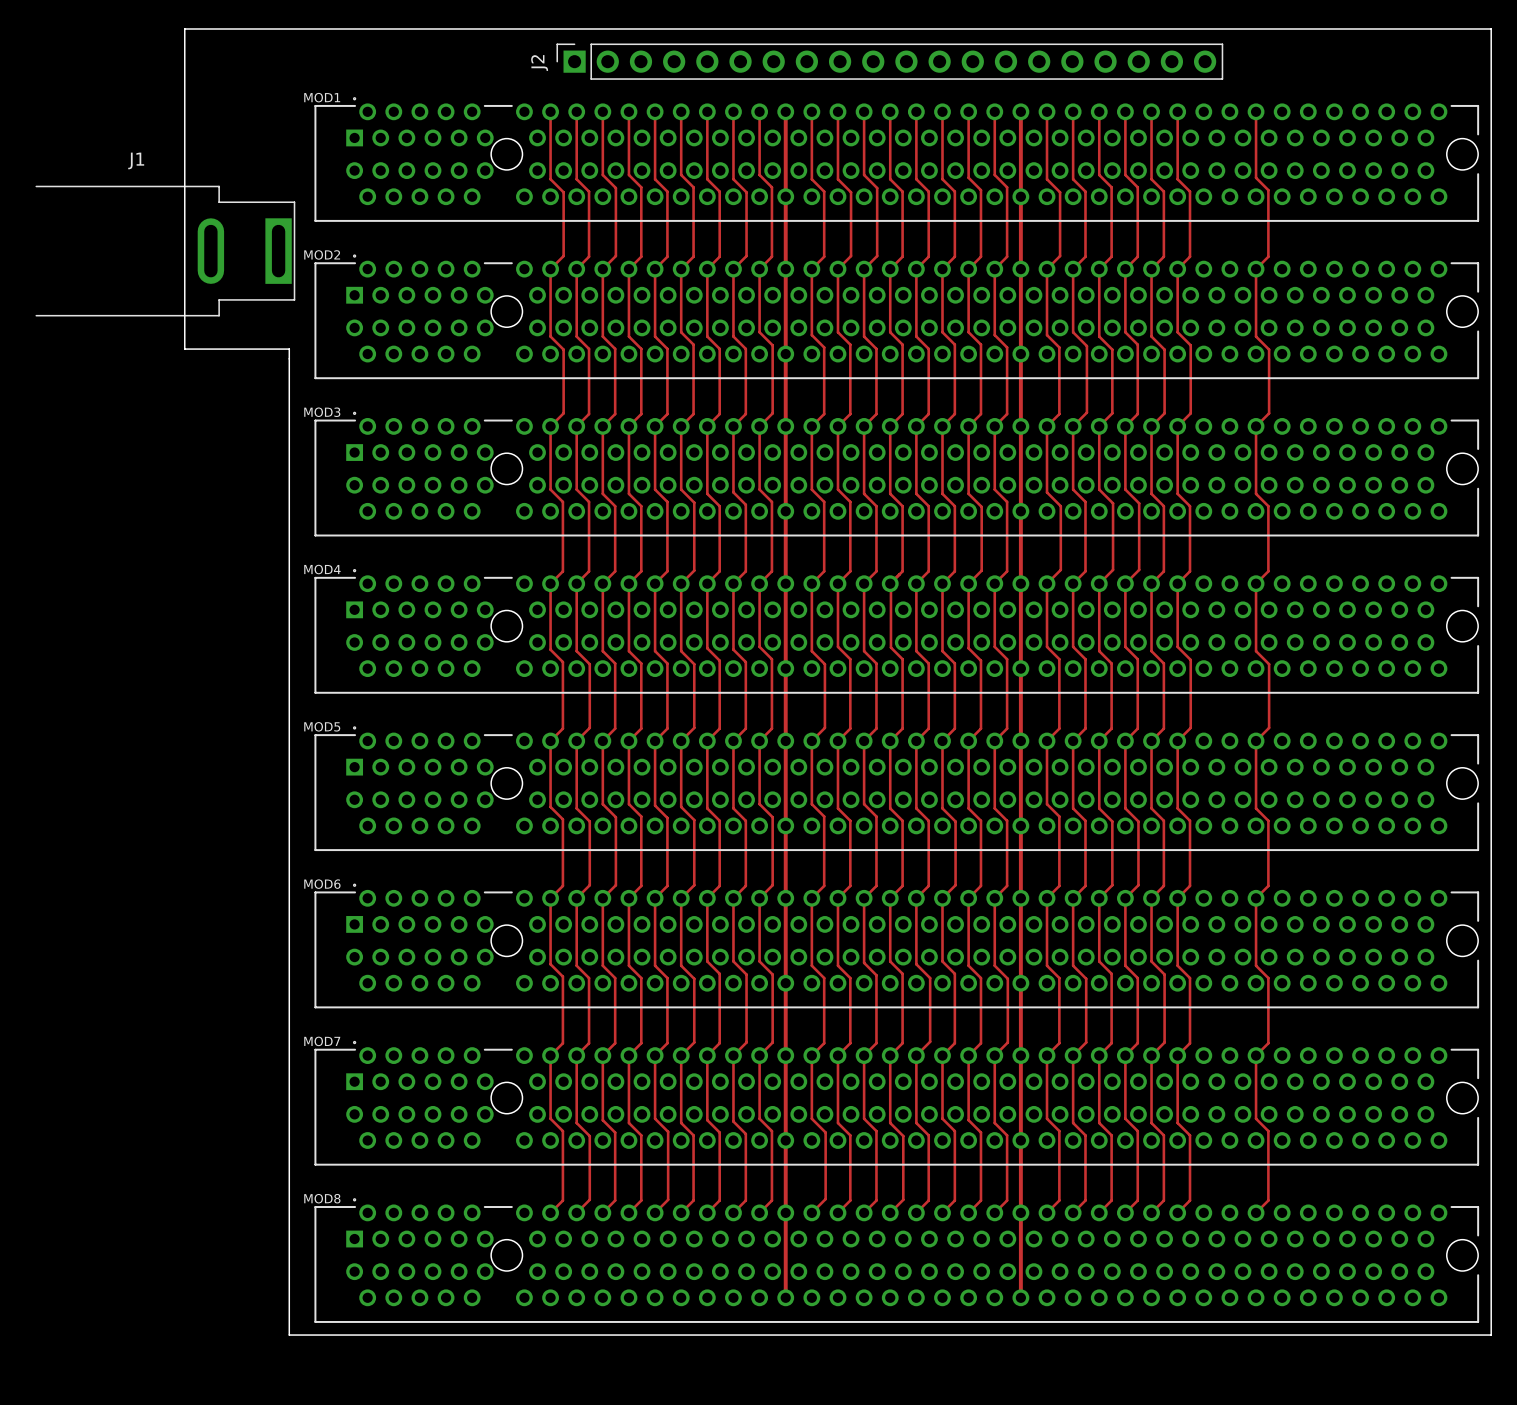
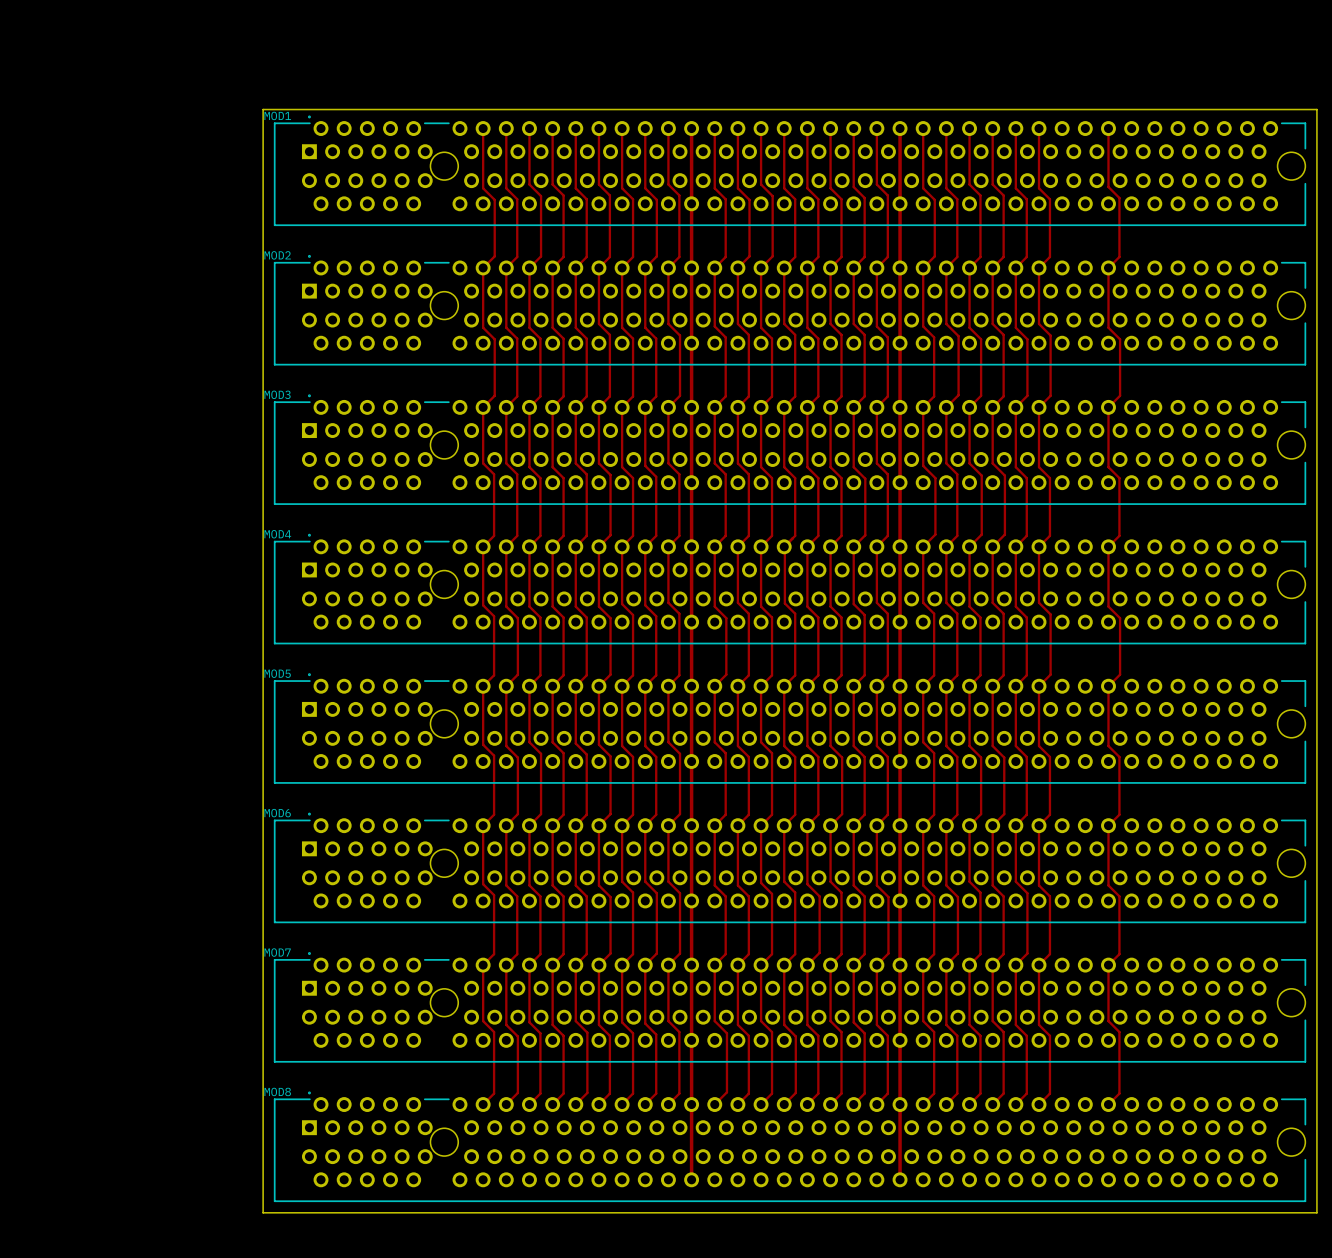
J2: (889, 61) -> none
board edge: (1491, 90) (1491, 28) (184, 28) (184, 349) (289, 349) (289, 1335) (302, 1335) -> (1316, 109) (263, 109) (263, 1212)
J1: (165, 251) -> none

